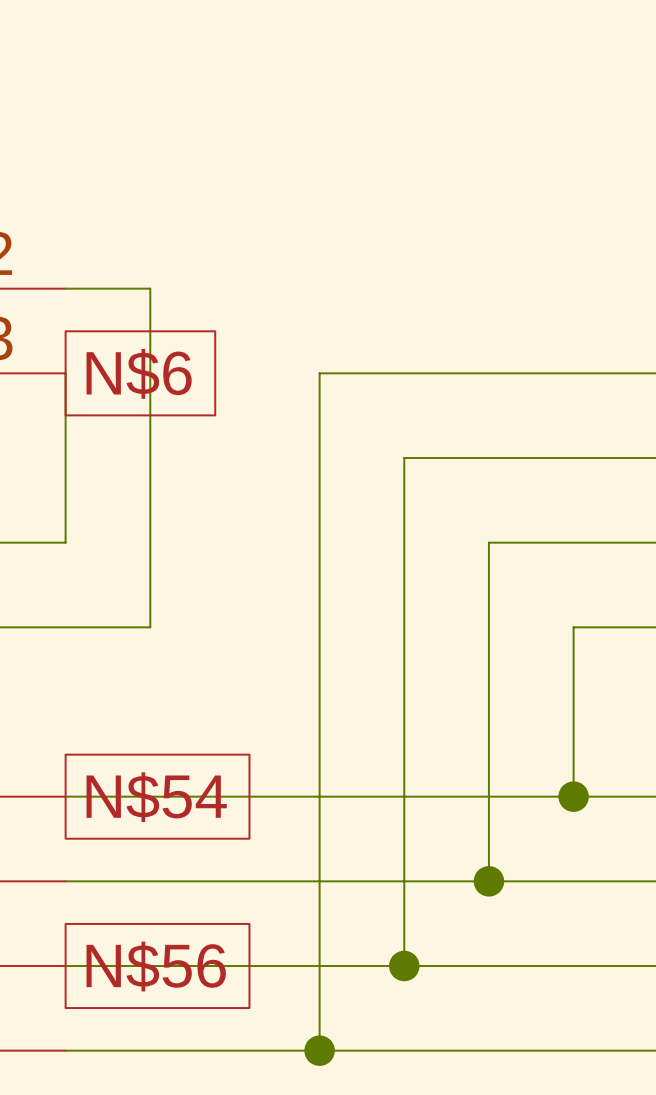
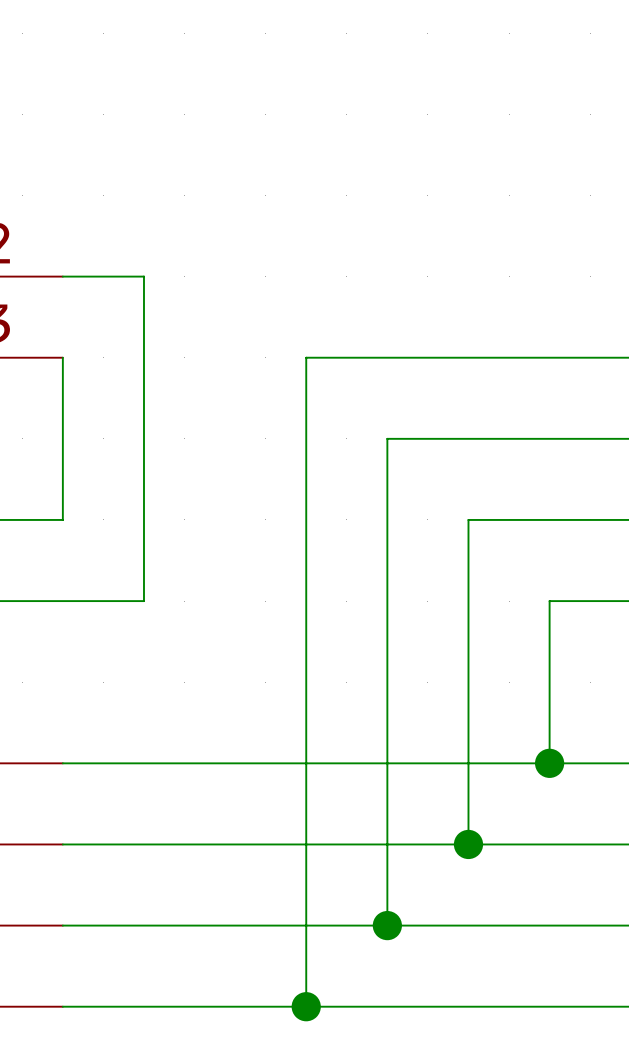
global label: N$6 (139, 373) -> none
global label: N$54 (156, 797) -> none
global label: N$56 (156, 966) -> none

